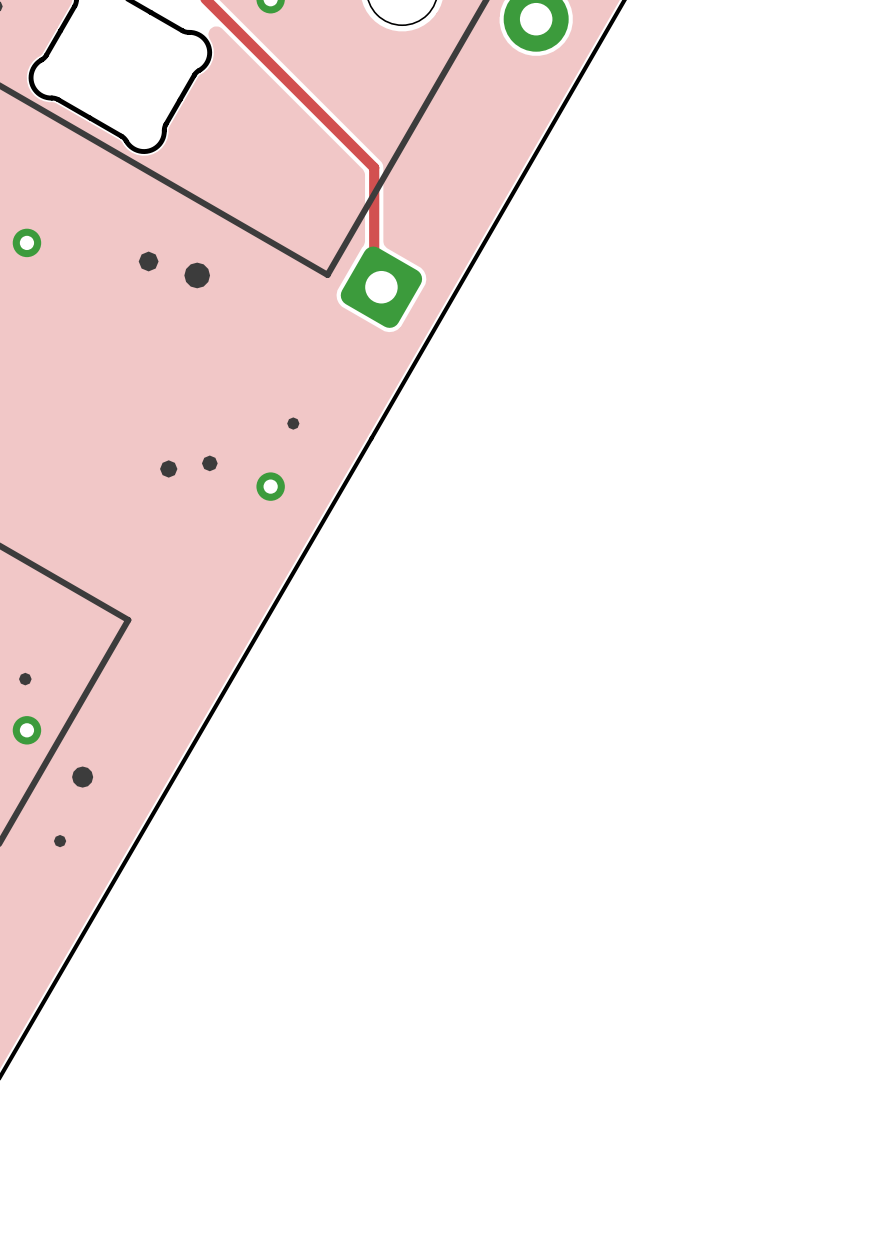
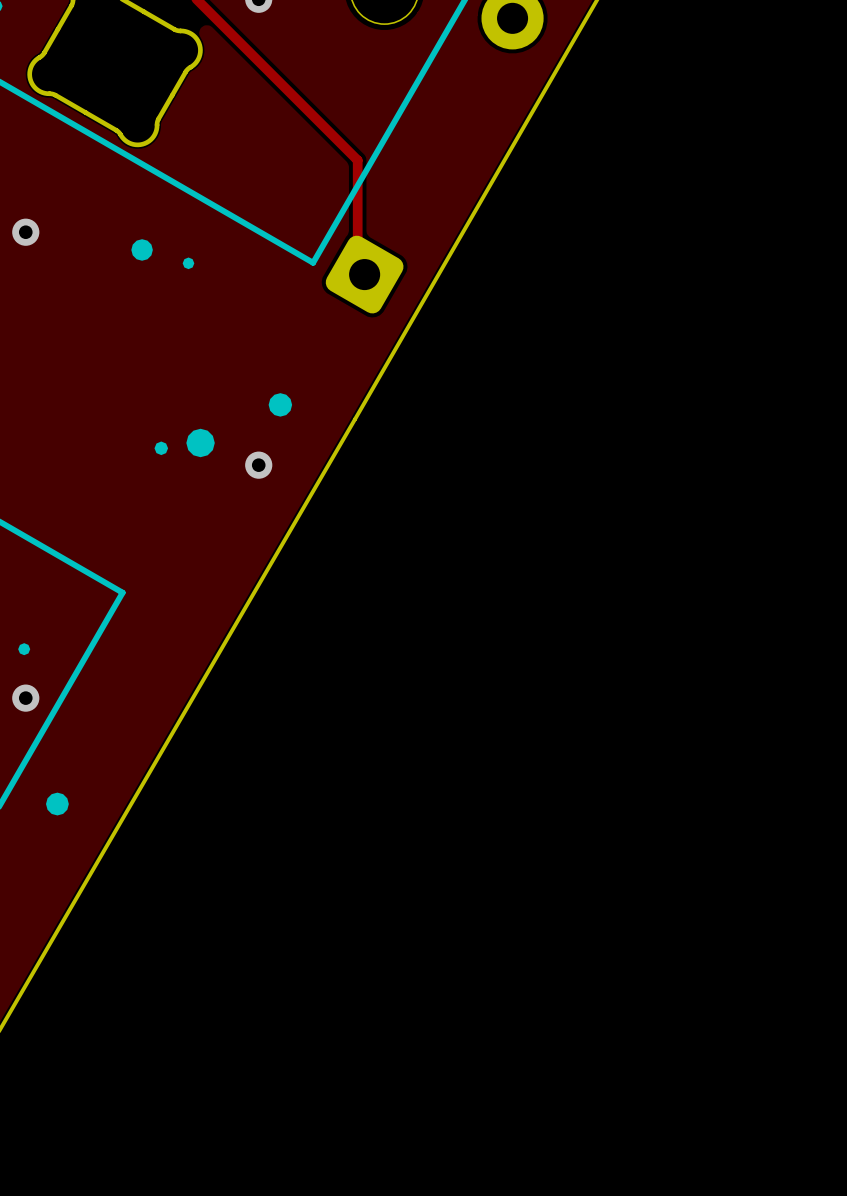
drawing: [138, 251, 159, 272] -> none
drawing shape: [184, 262, 211, 289] -> [182, 257, 195, 270]
drawing shape: [287, 417, 300, 430] -> [268, 393, 293, 417]
drawing: none -> [186, 428, 215, 458]
drawing: [160, 460, 178, 478] -> none
drawing position: (209, 463) -> (161, 448)
drawing position: (82, 777) -> (142, 249)
drawing shape: [53, 834, 67, 848] -> [46, 792, 69, 816]

